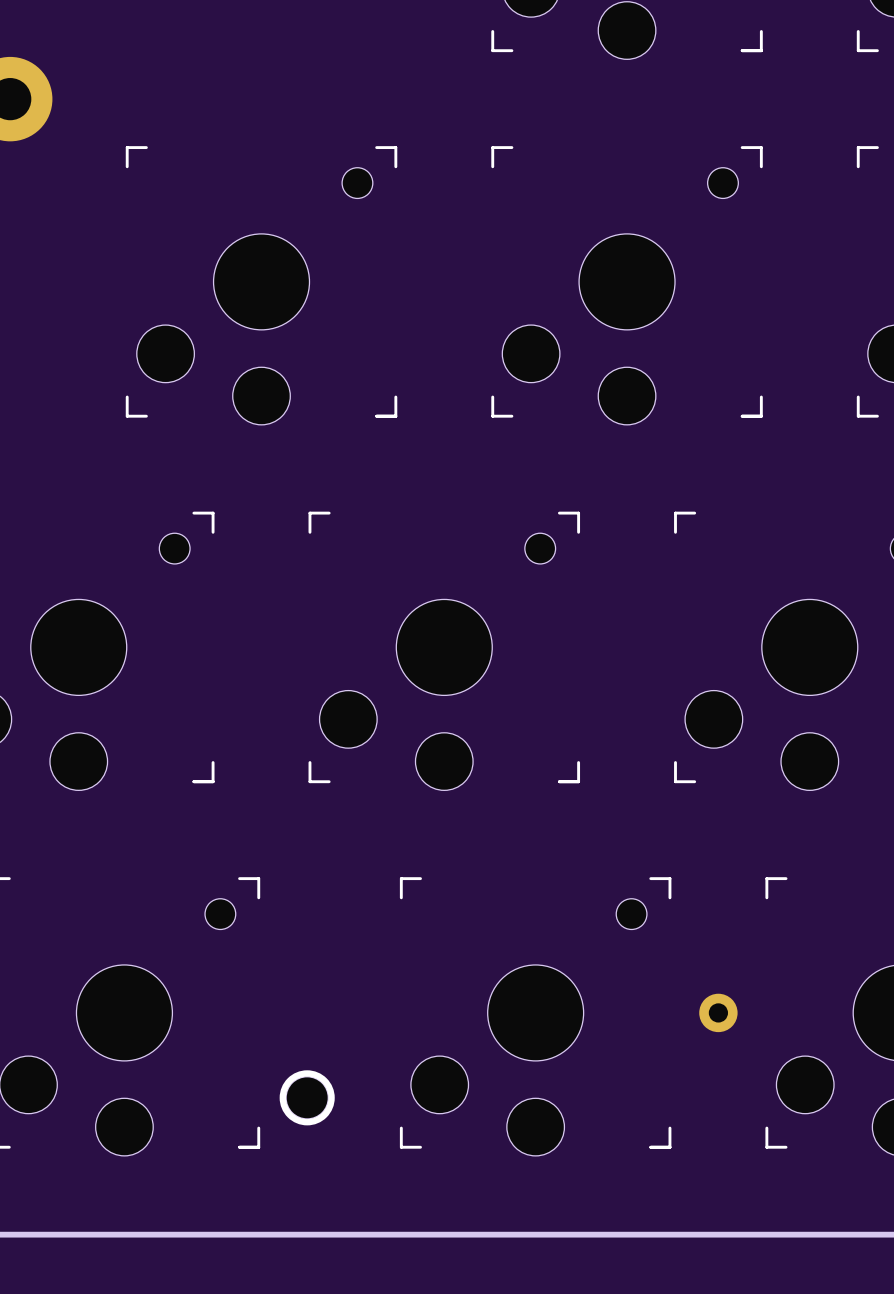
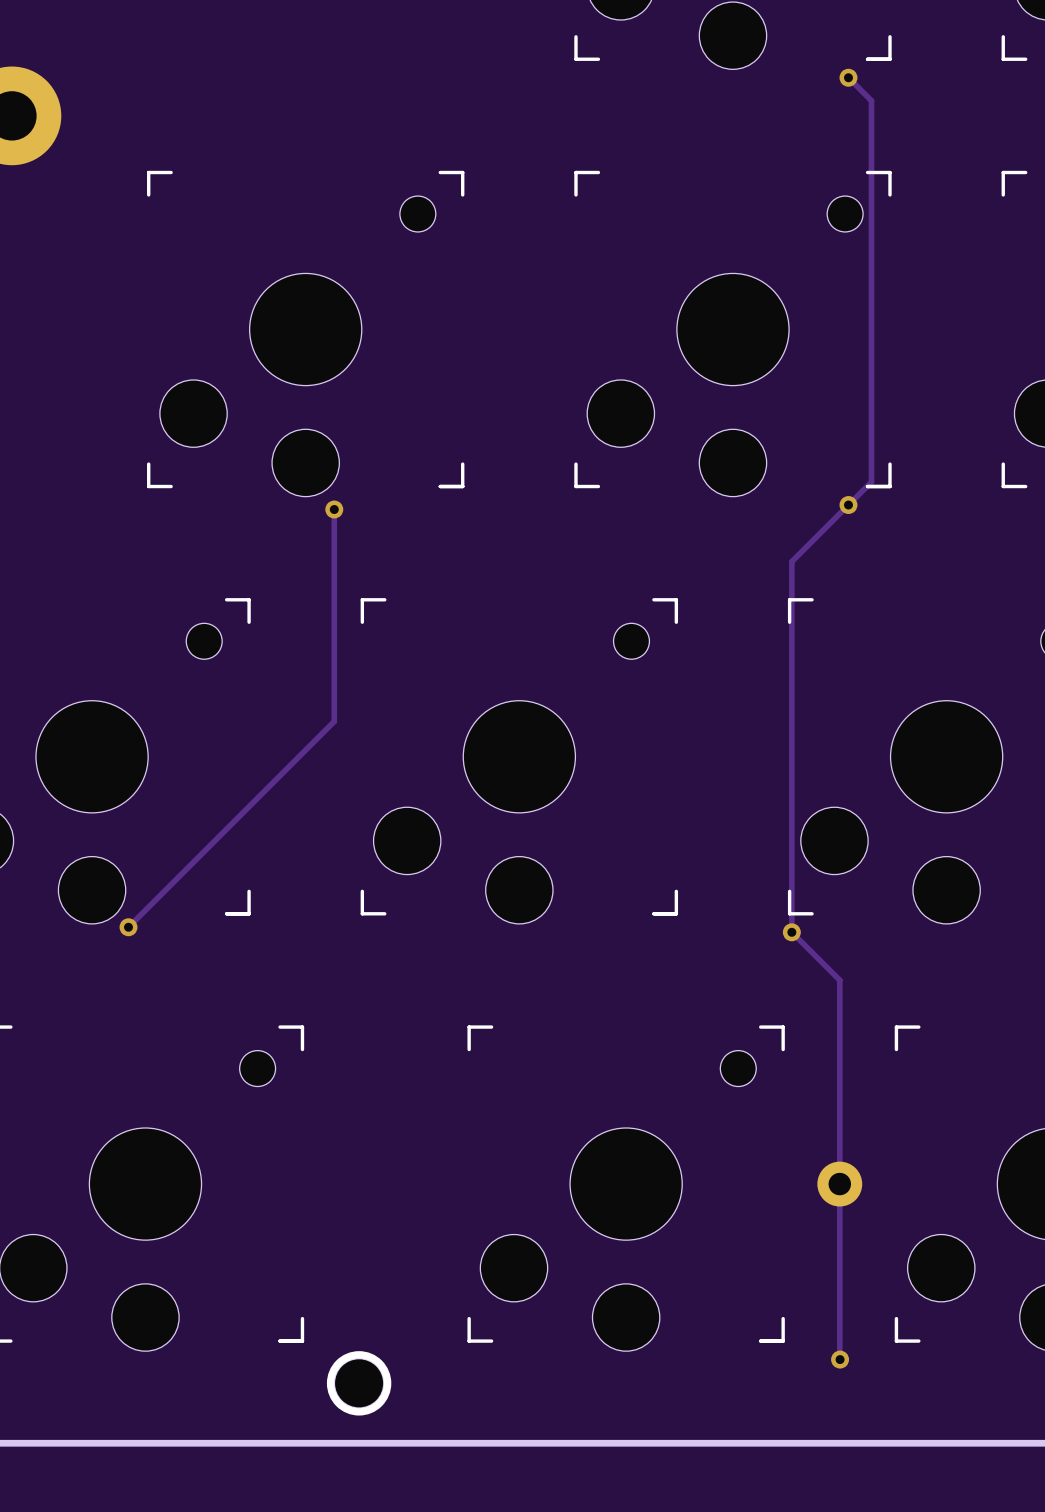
track: none -> (848, 77) (871, 100) (871, 482) (791, 561) (791, 932) (839, 980) (839, 1359)
via: none -> (848, 77)
via: none -> (848, 505)
track: none -> (334, 509) (334, 721) (128, 927)
via: none -> (334, 509)
via: none -> (128, 927)
via: none -> (791, 932)
part position: (307, 1097) -> (359, 1383)
via: none -> (840, 1359)

